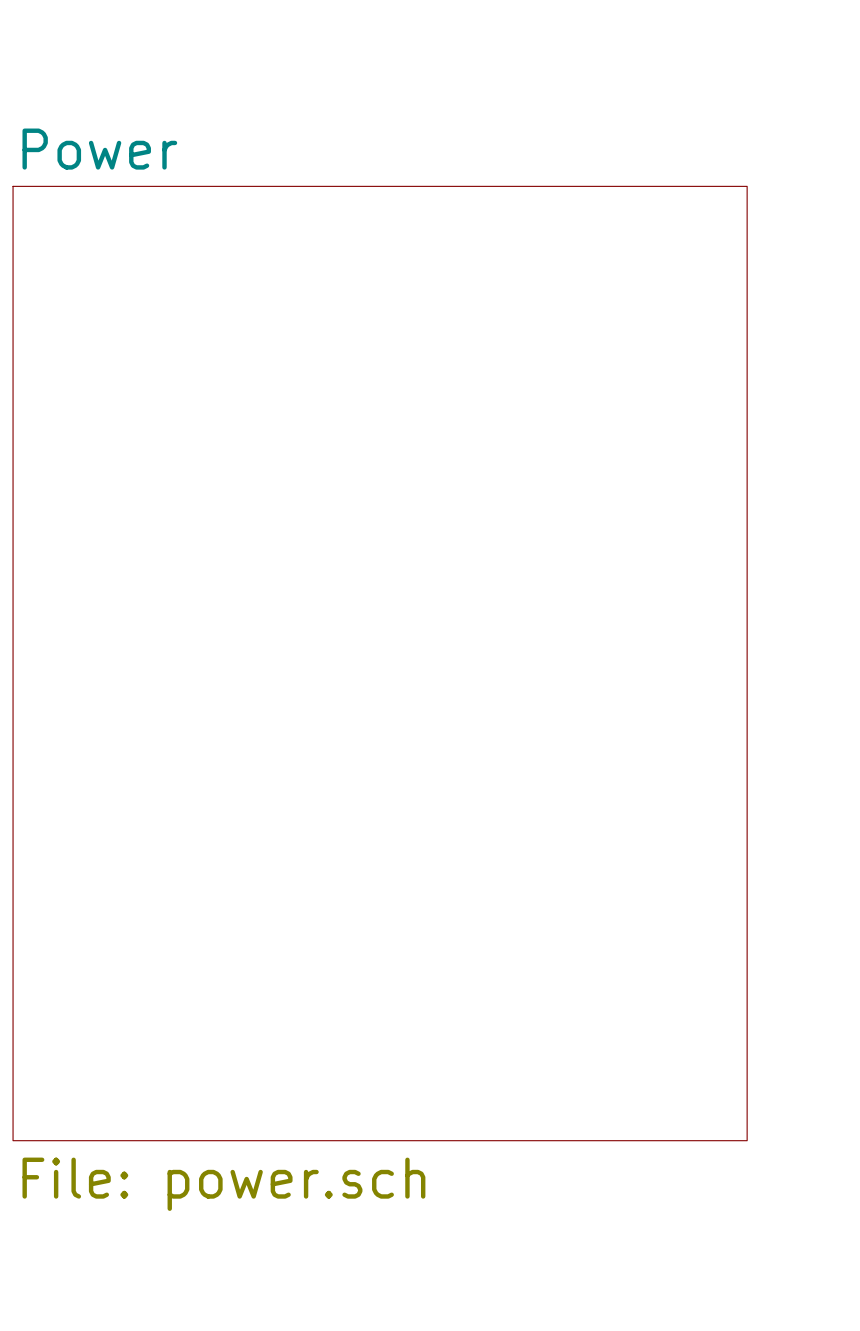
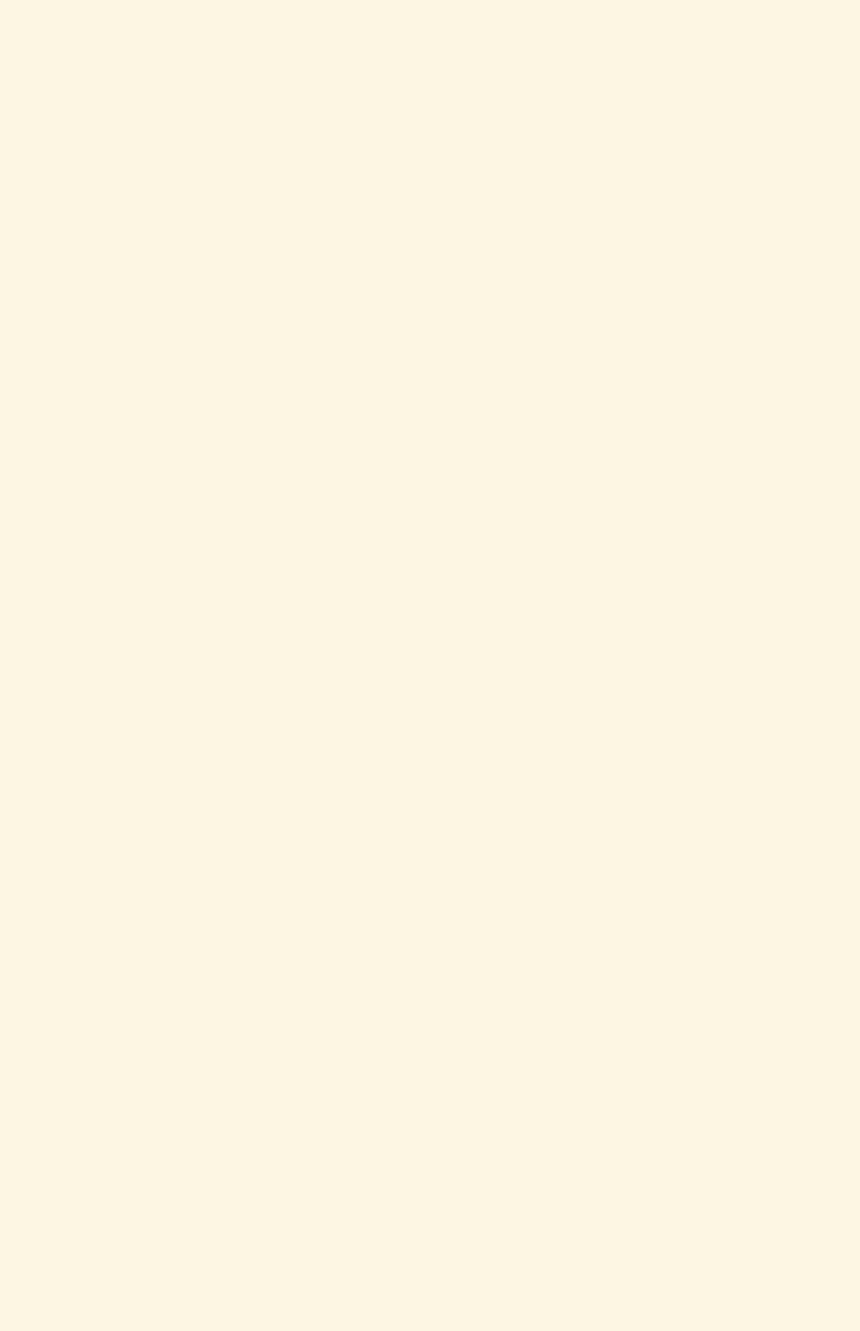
sheet Power: File: power.sch (380, 663) -> none

